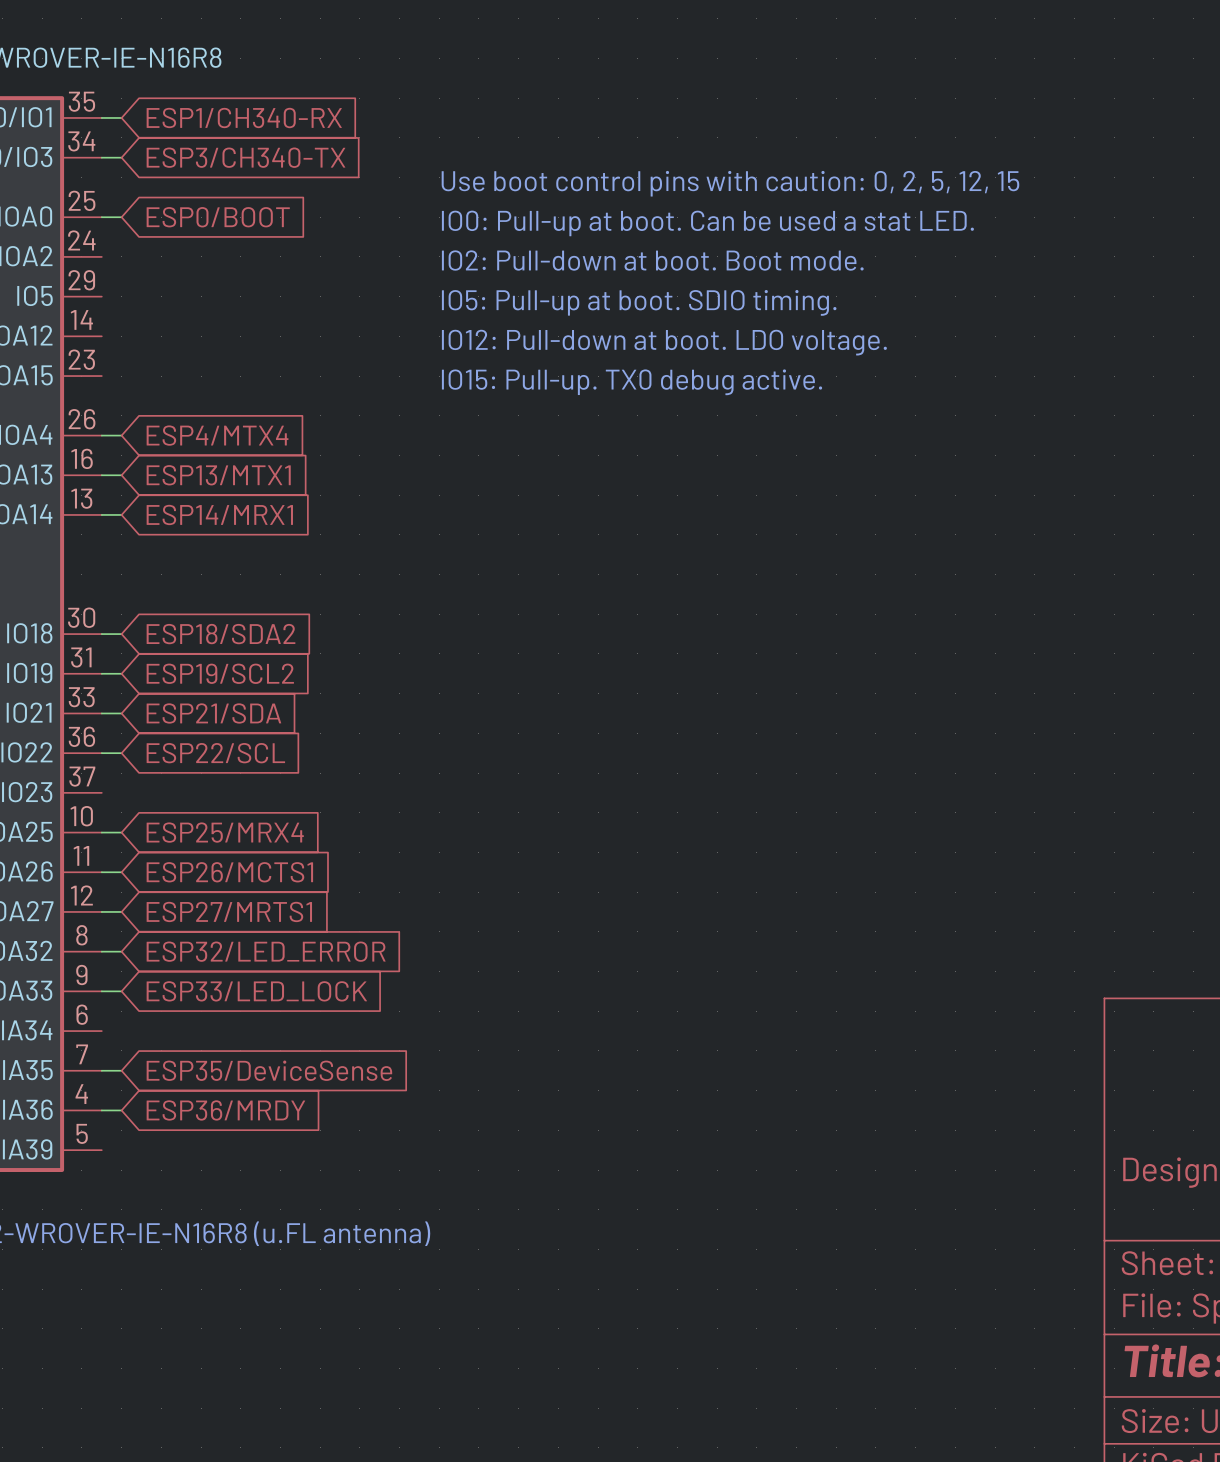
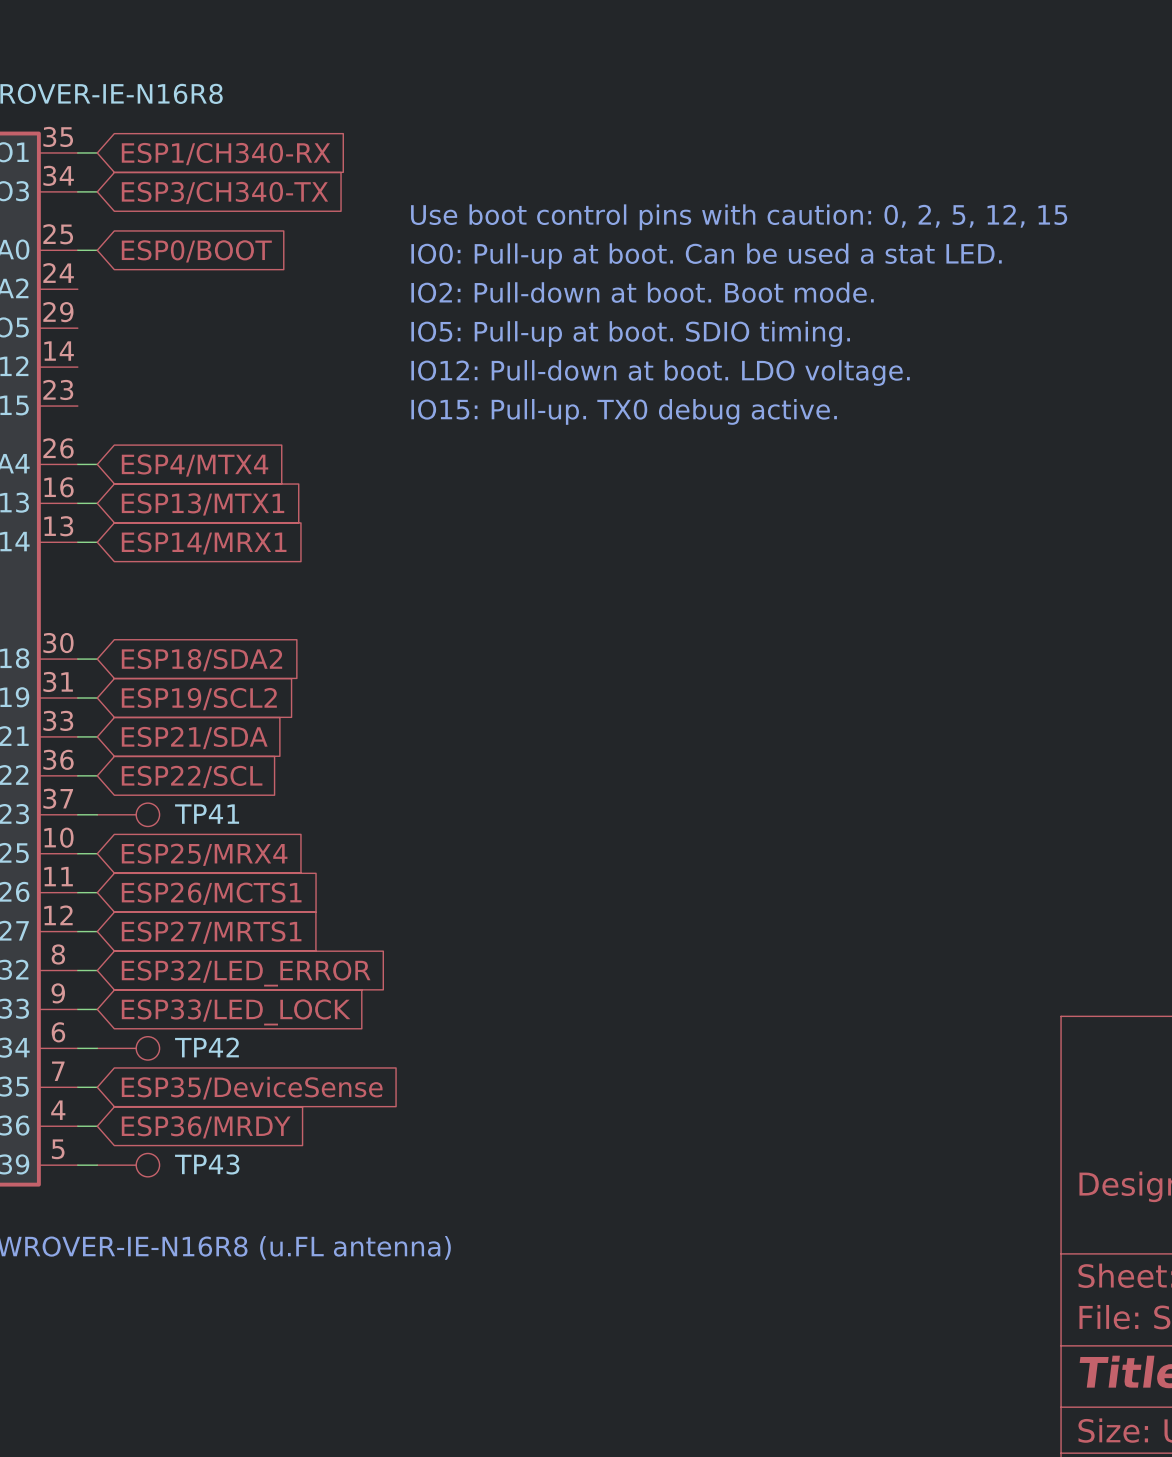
wire: none -> (77, 814) (97, 814)
TP41: none -> (128, 814)
wire: none -> (77, 1048) (97, 1048)
TP42: none -> (128, 1048)
wire: none -> (77, 1165) (97, 1165)
TP43: none -> (128, 1165)

